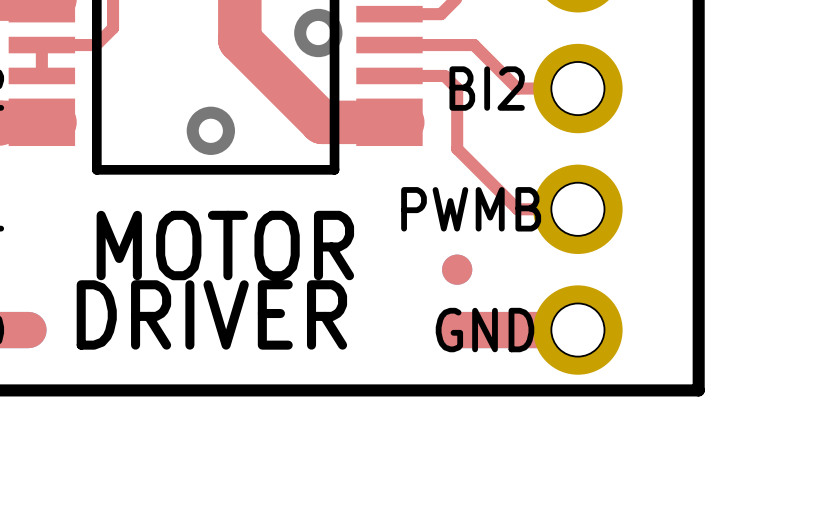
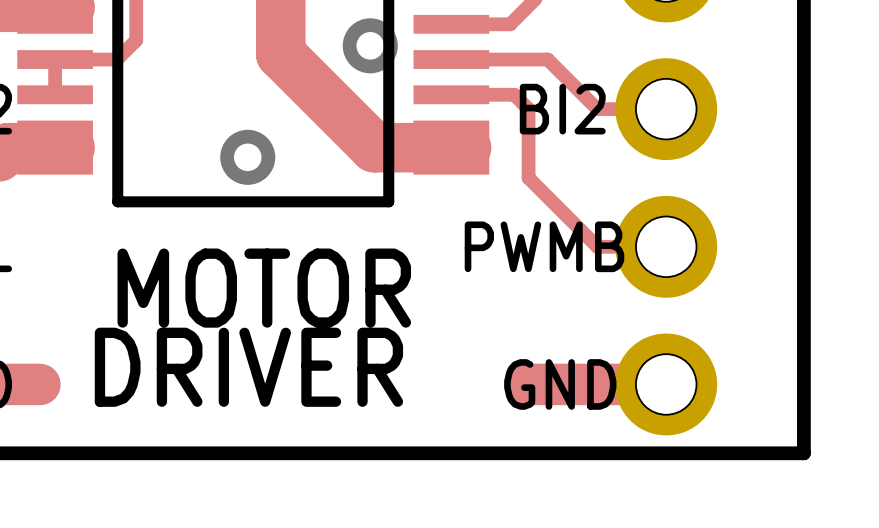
part: (457, 269) -> none

